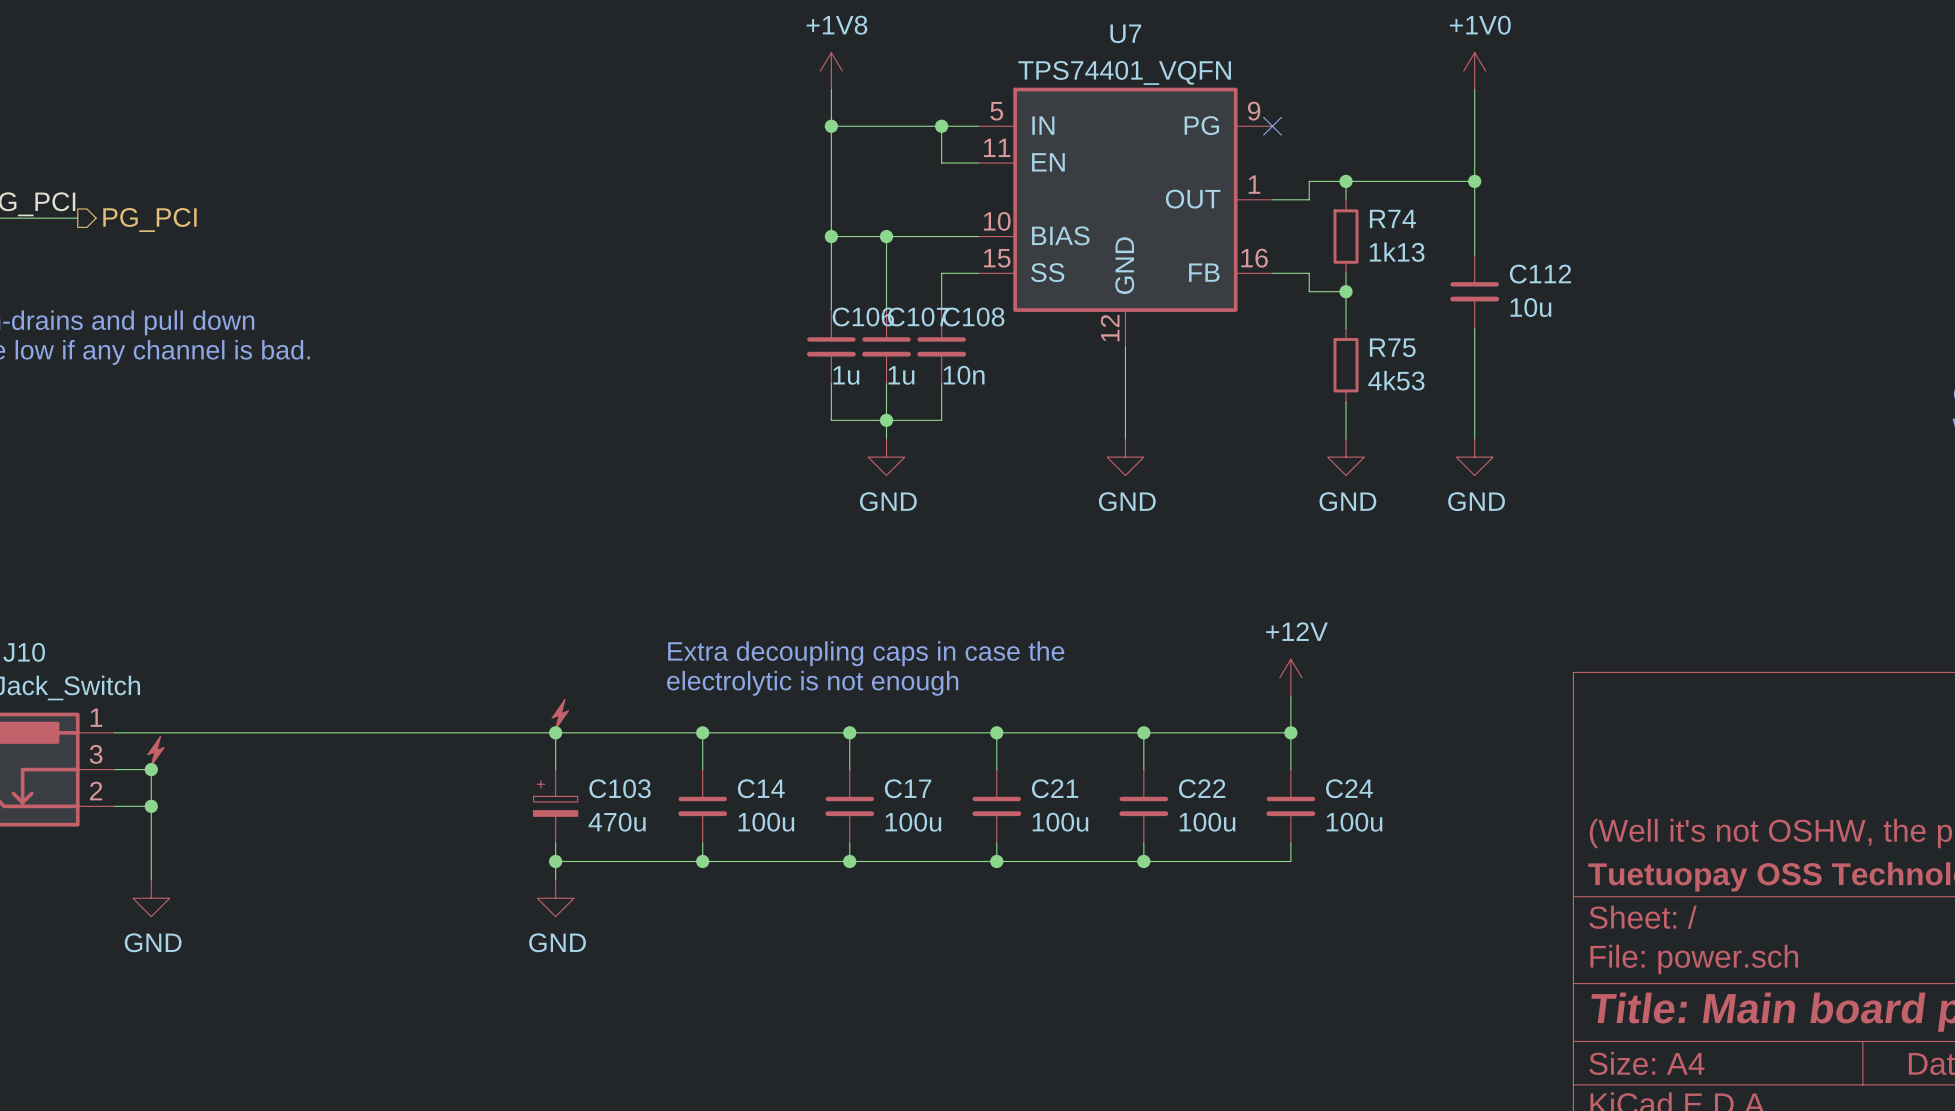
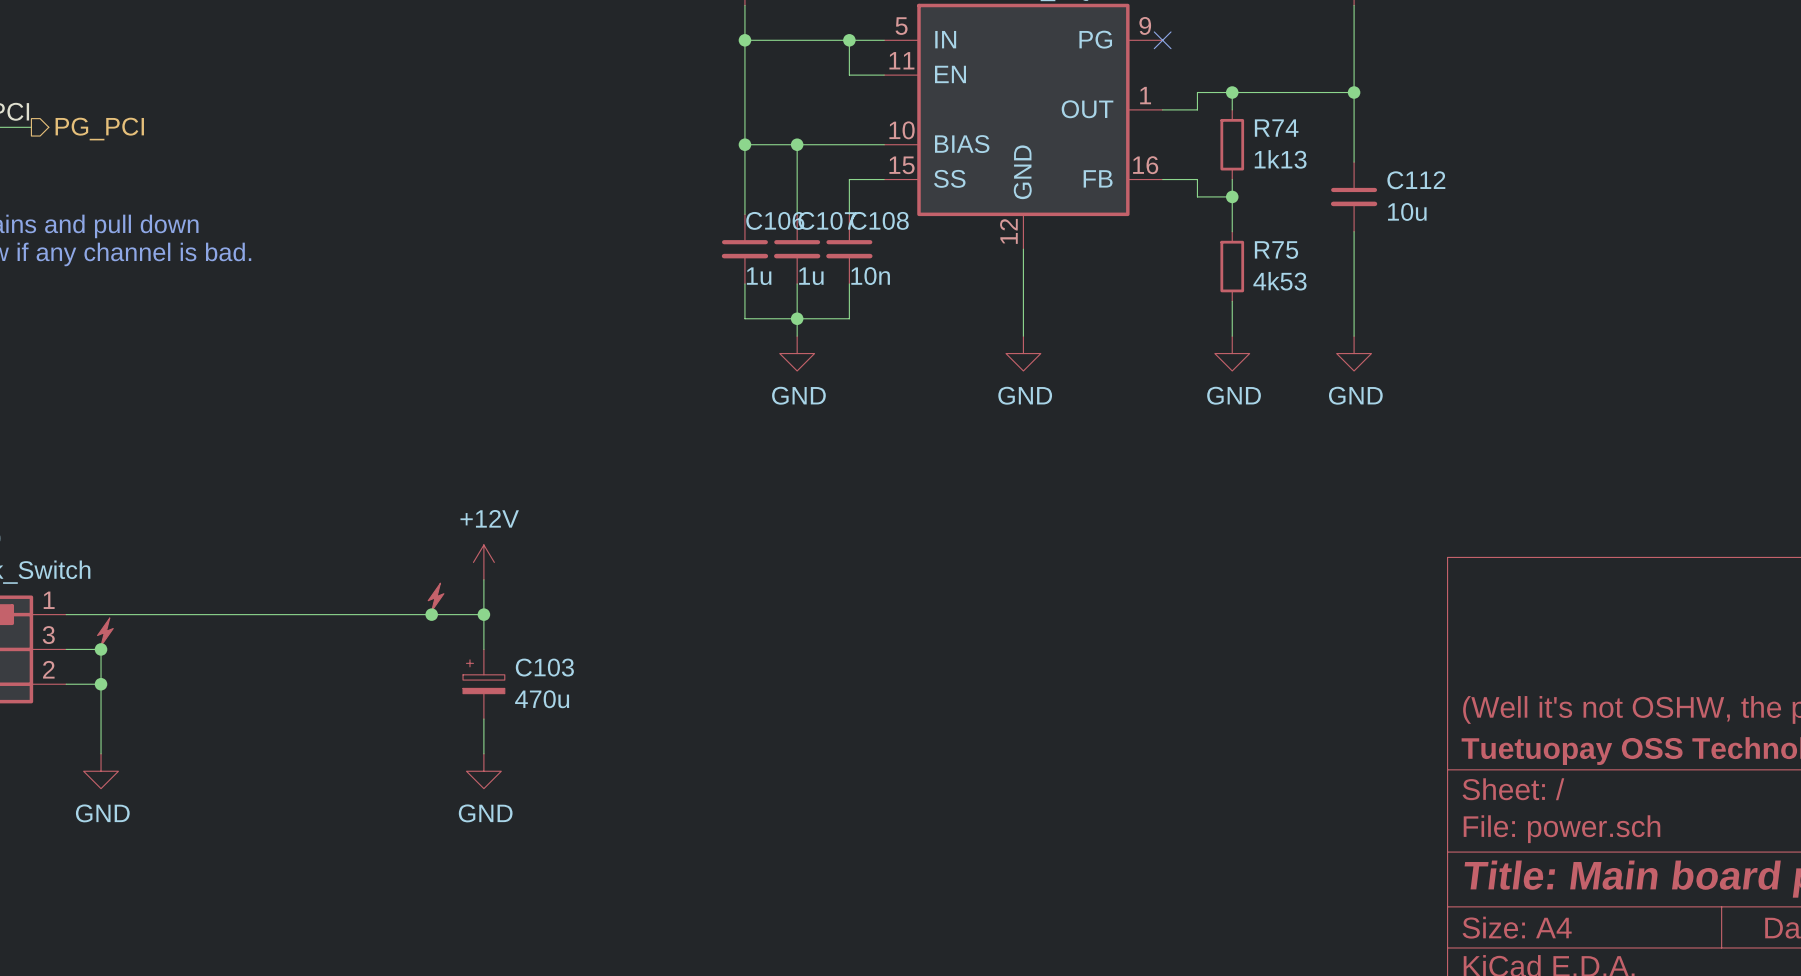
text: Extra decoupling caps in case the (866, 653) -> none
power symbol: none -> +12V (483, 562)
power symbol: +12V (1290, 677) -> none
text: electrolytic is not enough (812, 683) -> none
wire: (1290, 696) (1290, 769) -> none
power symbol position: (560, 714) -> (436, 597)
junction: none -> (431, 614)
wire: (555, 732) (1290, 732) -> (483, 614) (483, 579)
wire: (702, 732) (702, 769) -> none
junction: (702, 732) -> none
wire: (849, 732) (849, 769) -> none
junction: (849, 732) -> none
wire: (996, 732) (996, 769) -> none
junction: (996, 732) -> none
wire: (1143, 732) (1143, 769) -> none
junction: (1143, 732) -> none
junction: (1290, 732) -> none
C14: 100u (702, 806) -> none
C17: 100u (849, 806) -> none
C21: 100u (996, 806) -> none
C22: 100u (1143, 806) -> none
C24: 100u (1290, 806) -> none
wire: (702, 843) (702, 861) -> none
wire: (849, 843) (849, 861) -> none
wire: (996, 843) (996, 861) -> none
wire: (1143, 843) (1143, 861) -> none
wire: (1290, 843) (1290, 861) (555, 861) -> none
junction: (555, 861) -> none
junction: (702, 861) -> none
junction: (849, 861) -> none
junction: (996, 861) -> none
junction: (1143, 861) -> none

